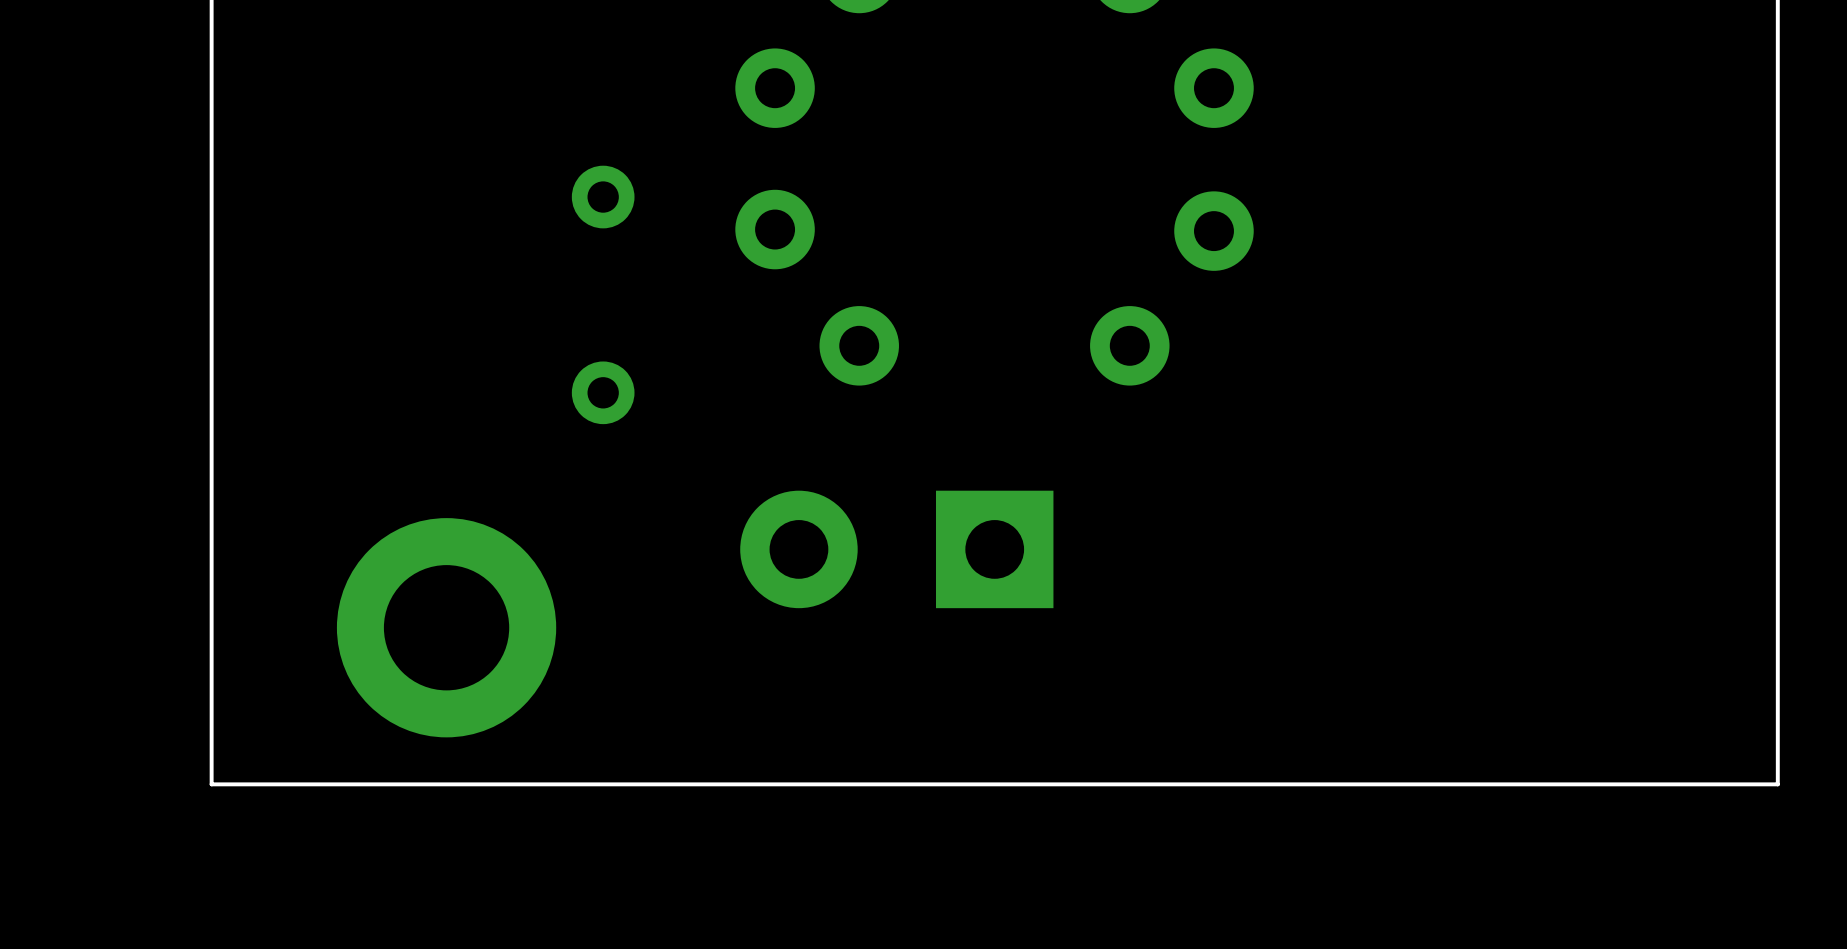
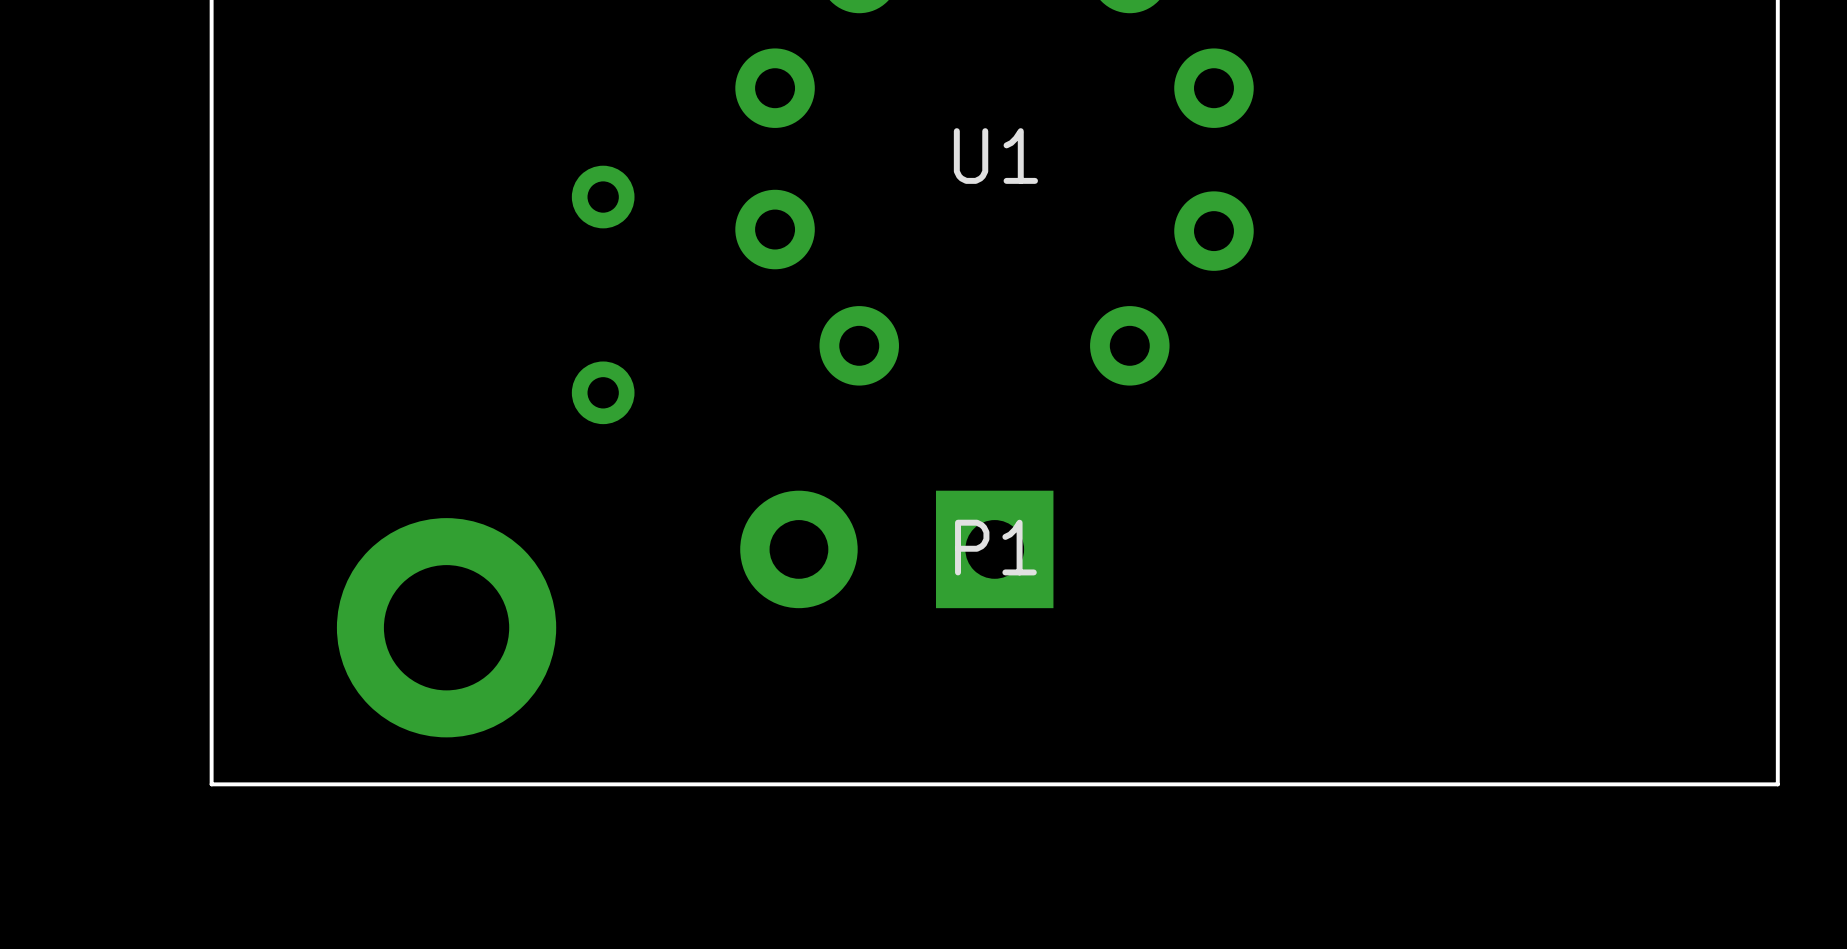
U1 name: none -> U1 (995, 156)
P1 name: none -> P1 (995, 547)

